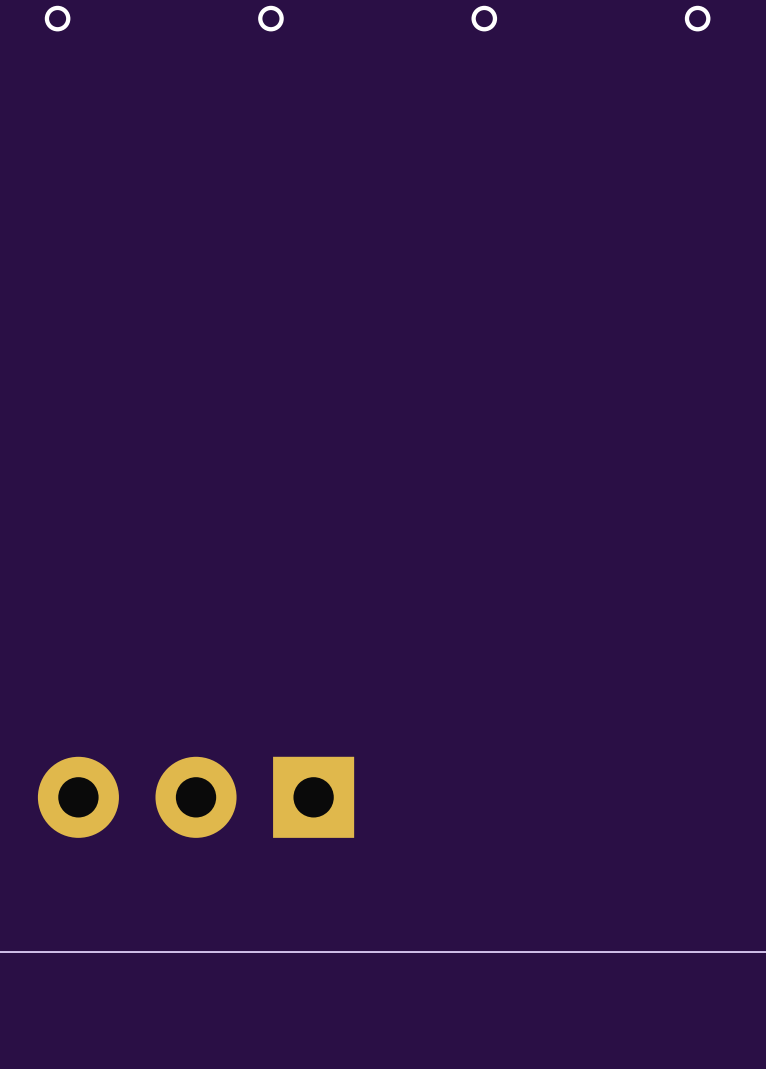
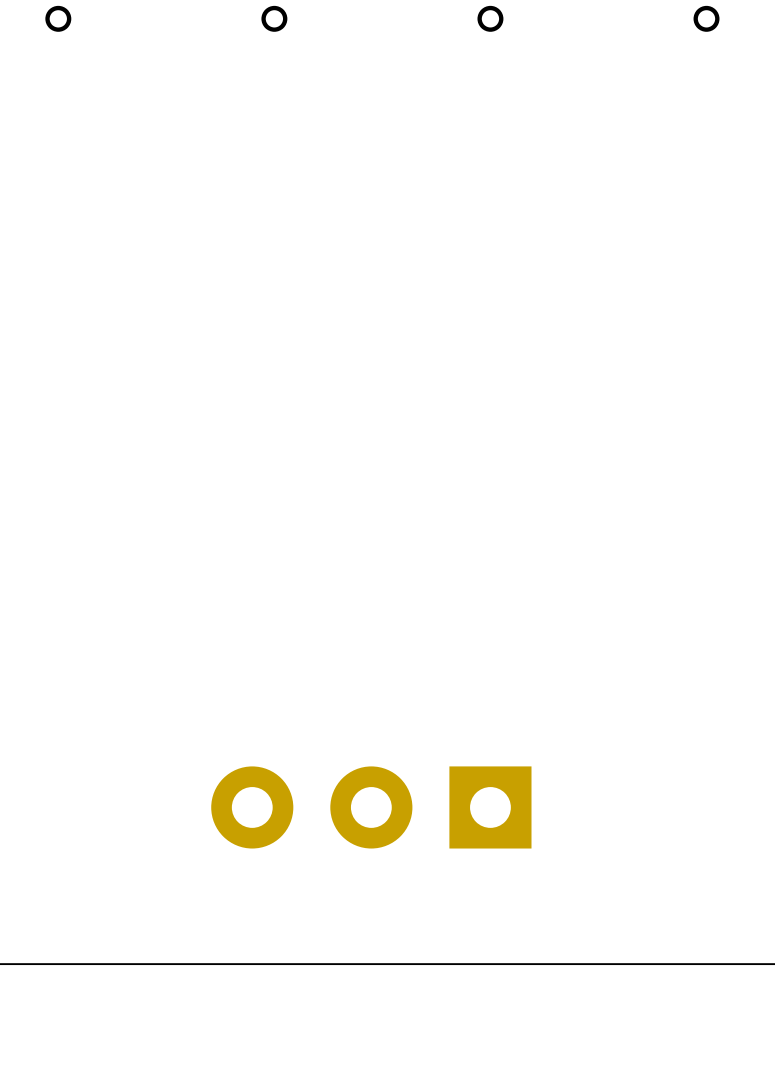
part position: (196, 797) -> (371, 807)

